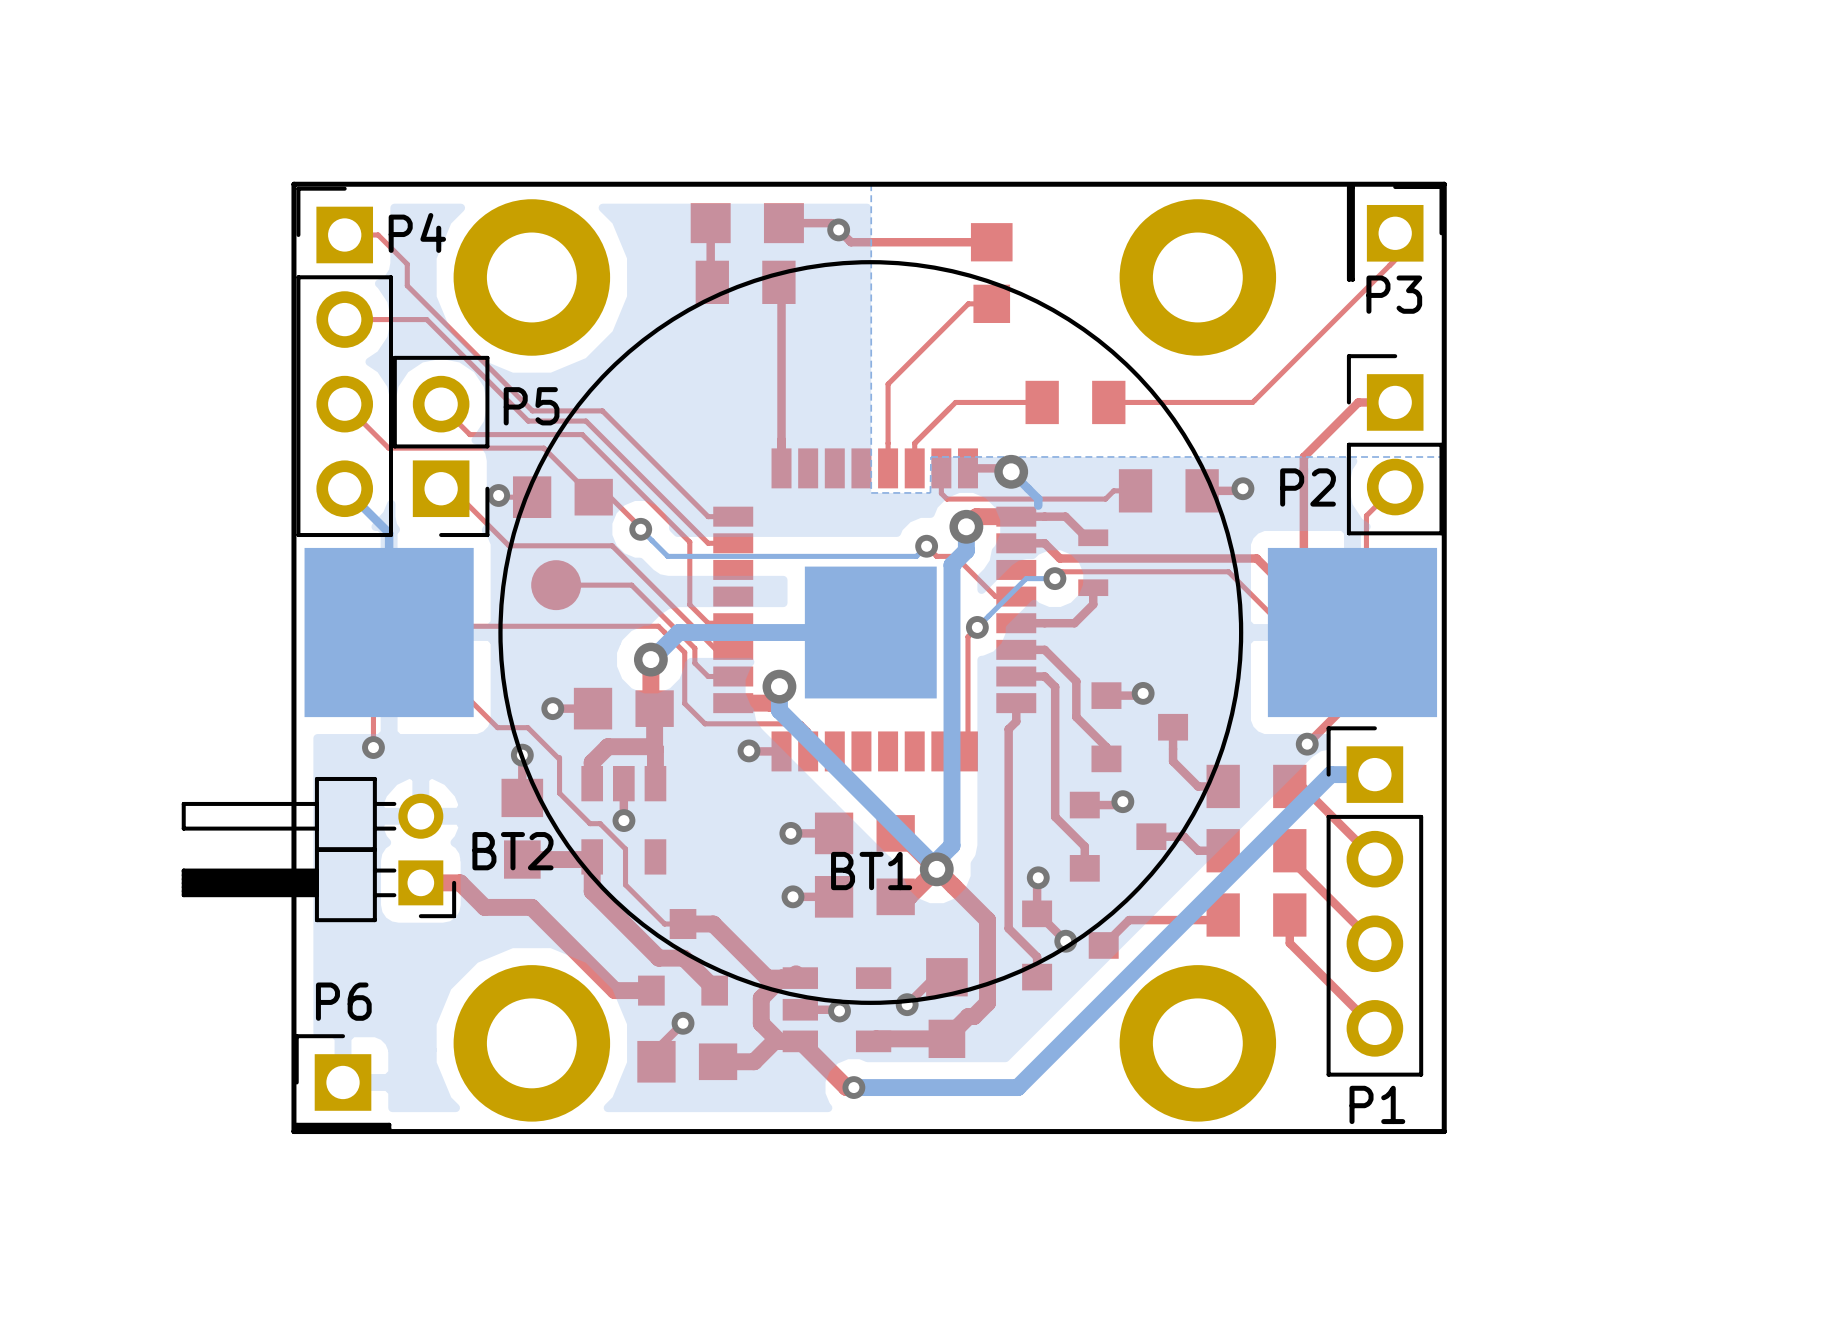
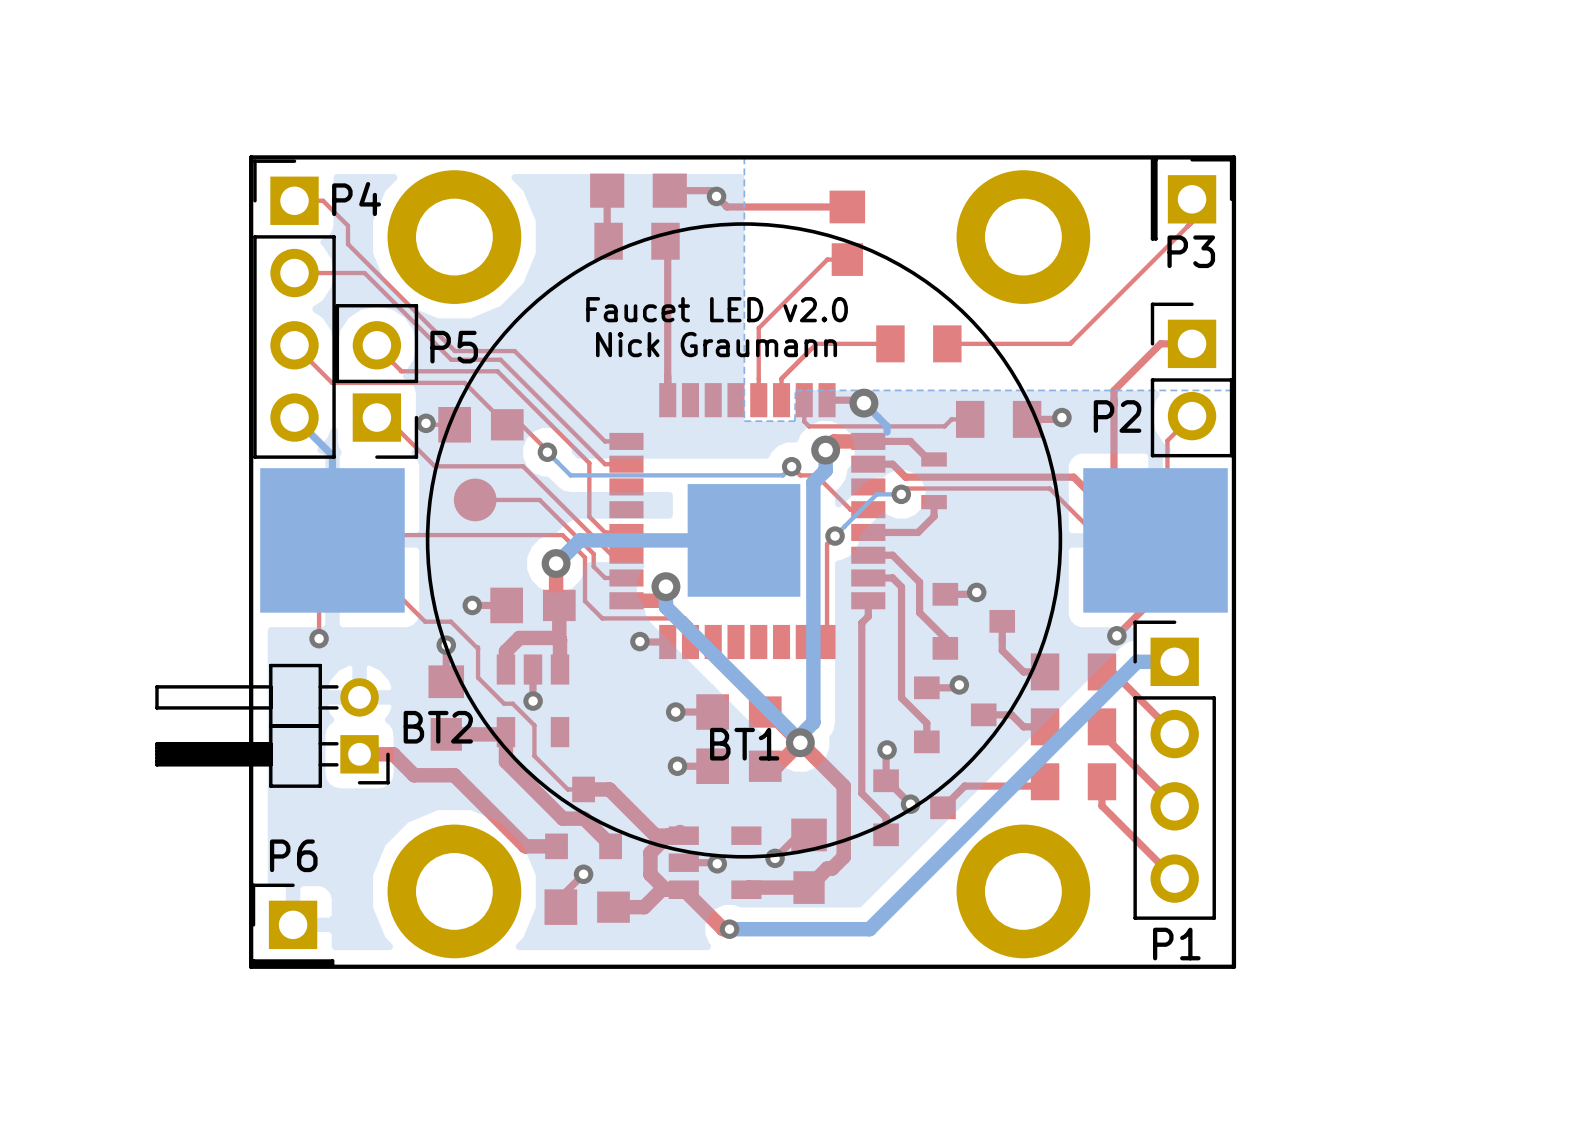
text: none -> Faucet LED v2.0 (717, 309)
text: none -> Nick Graumann (716, 344)

